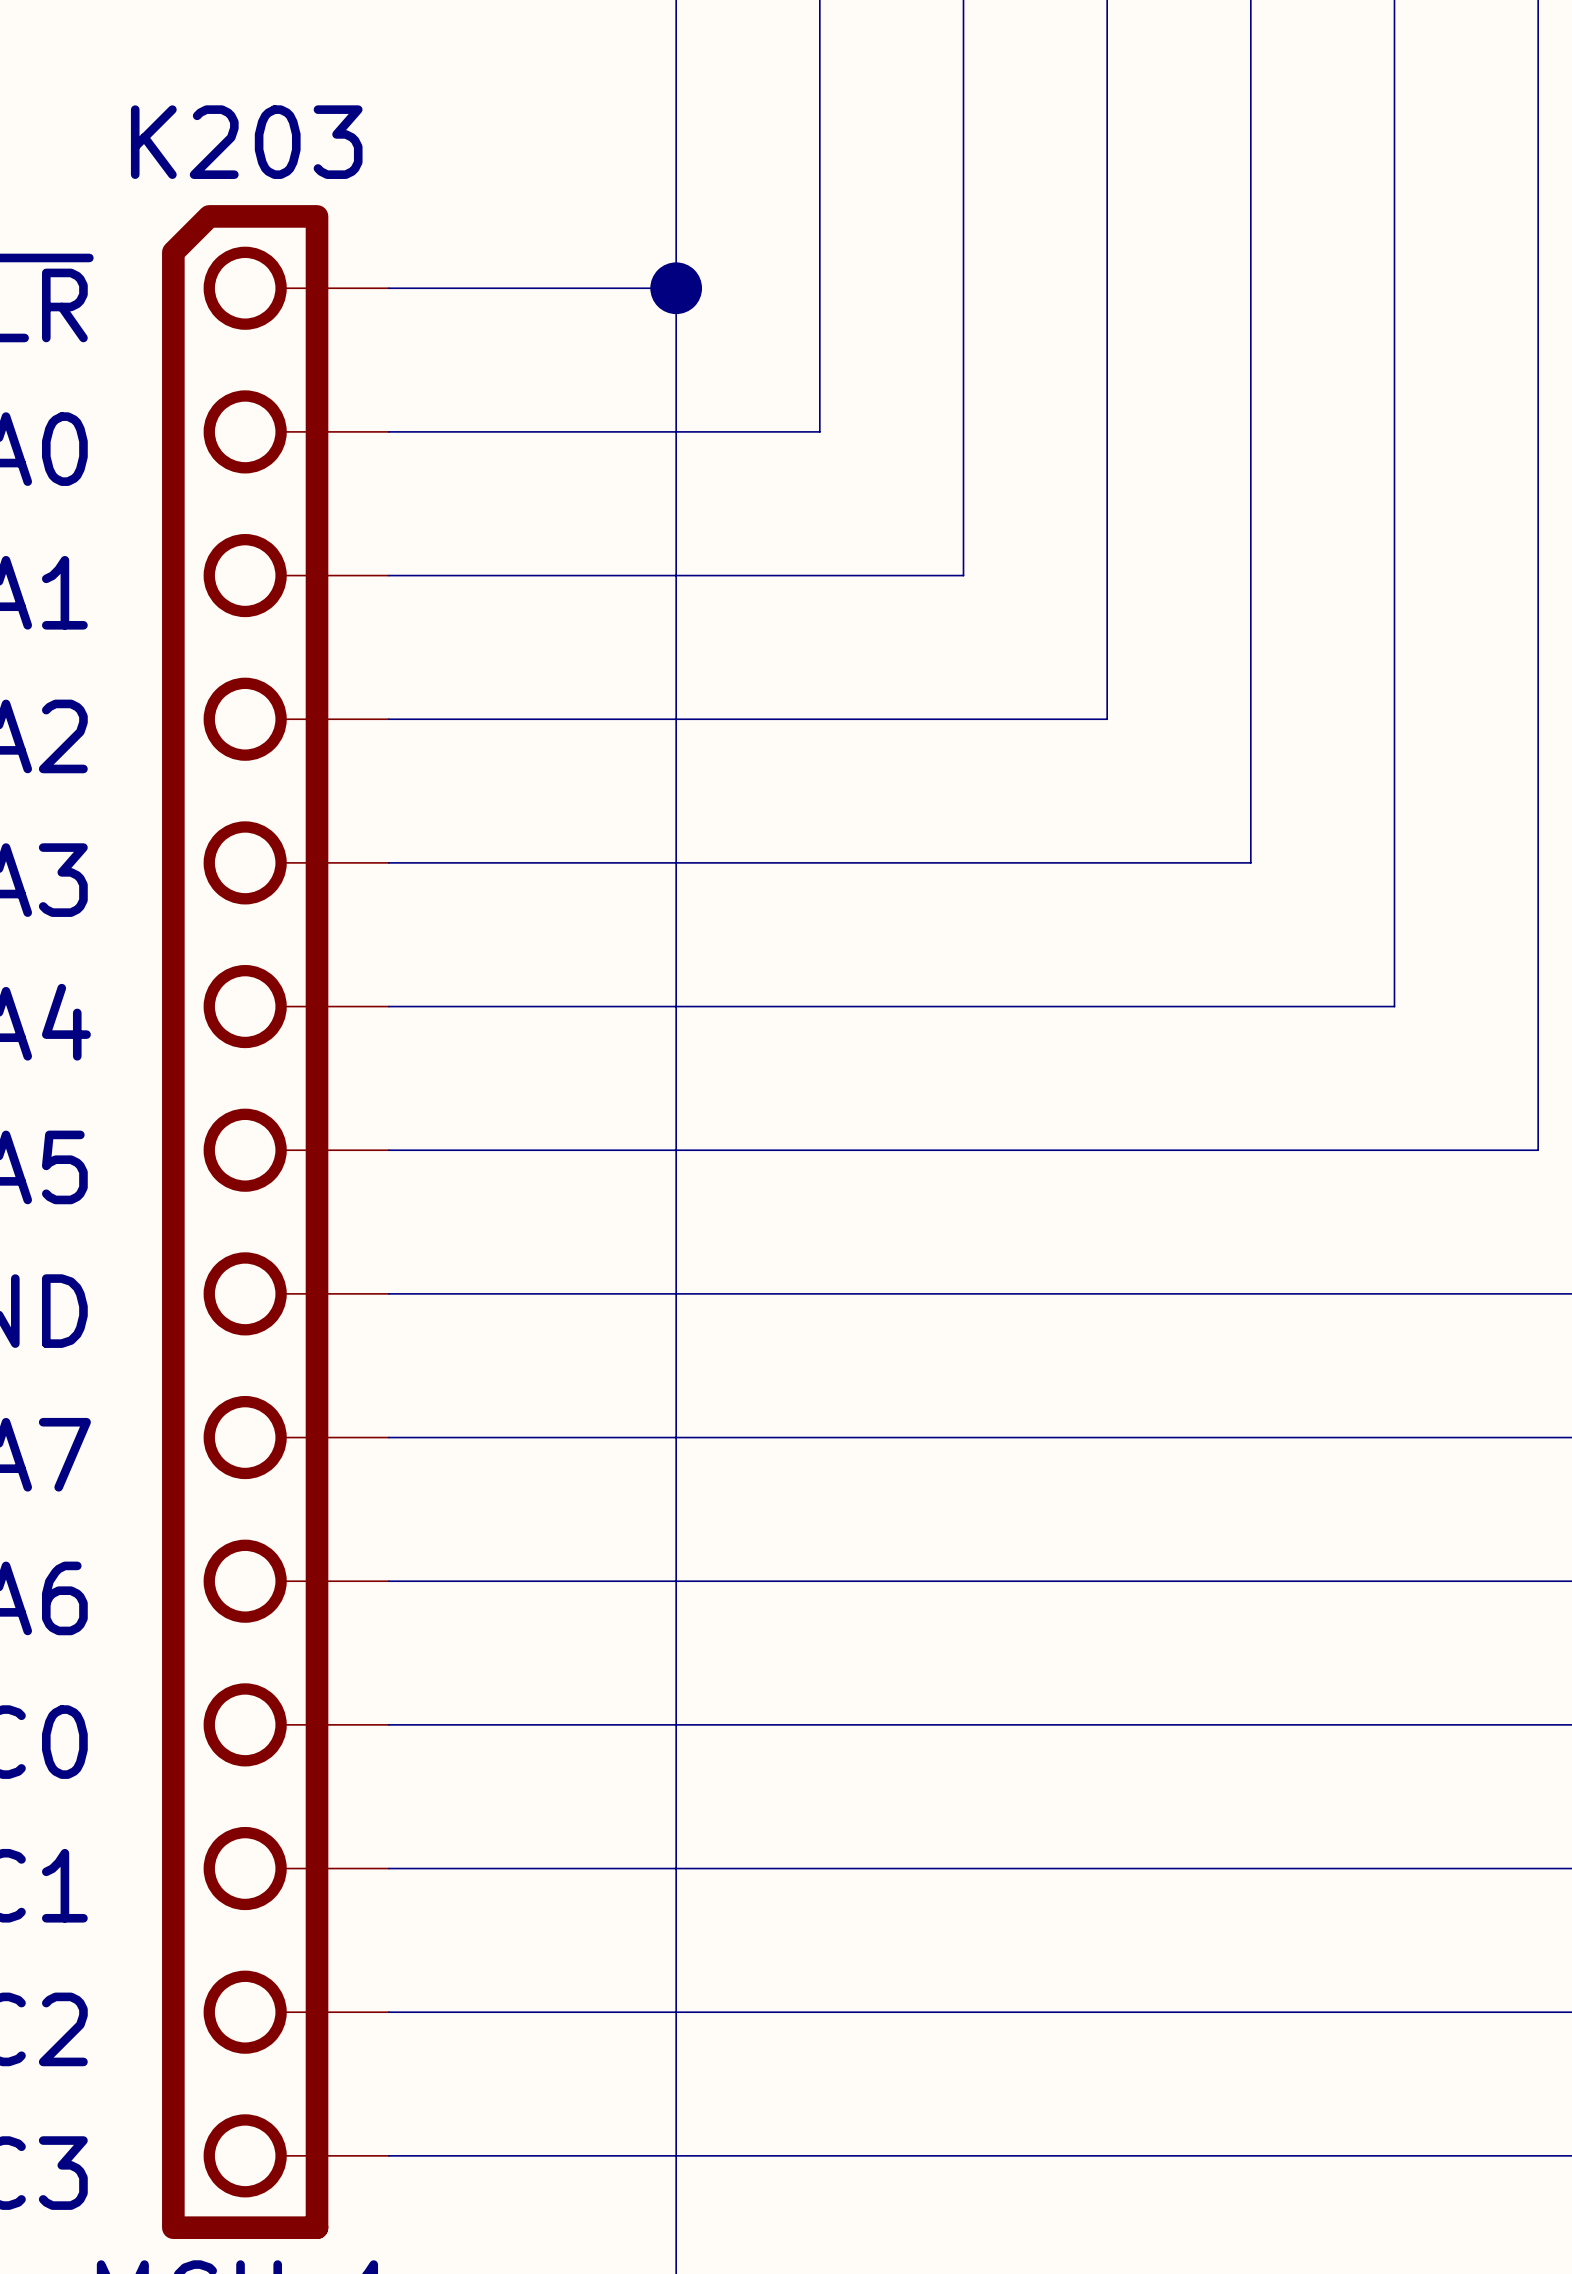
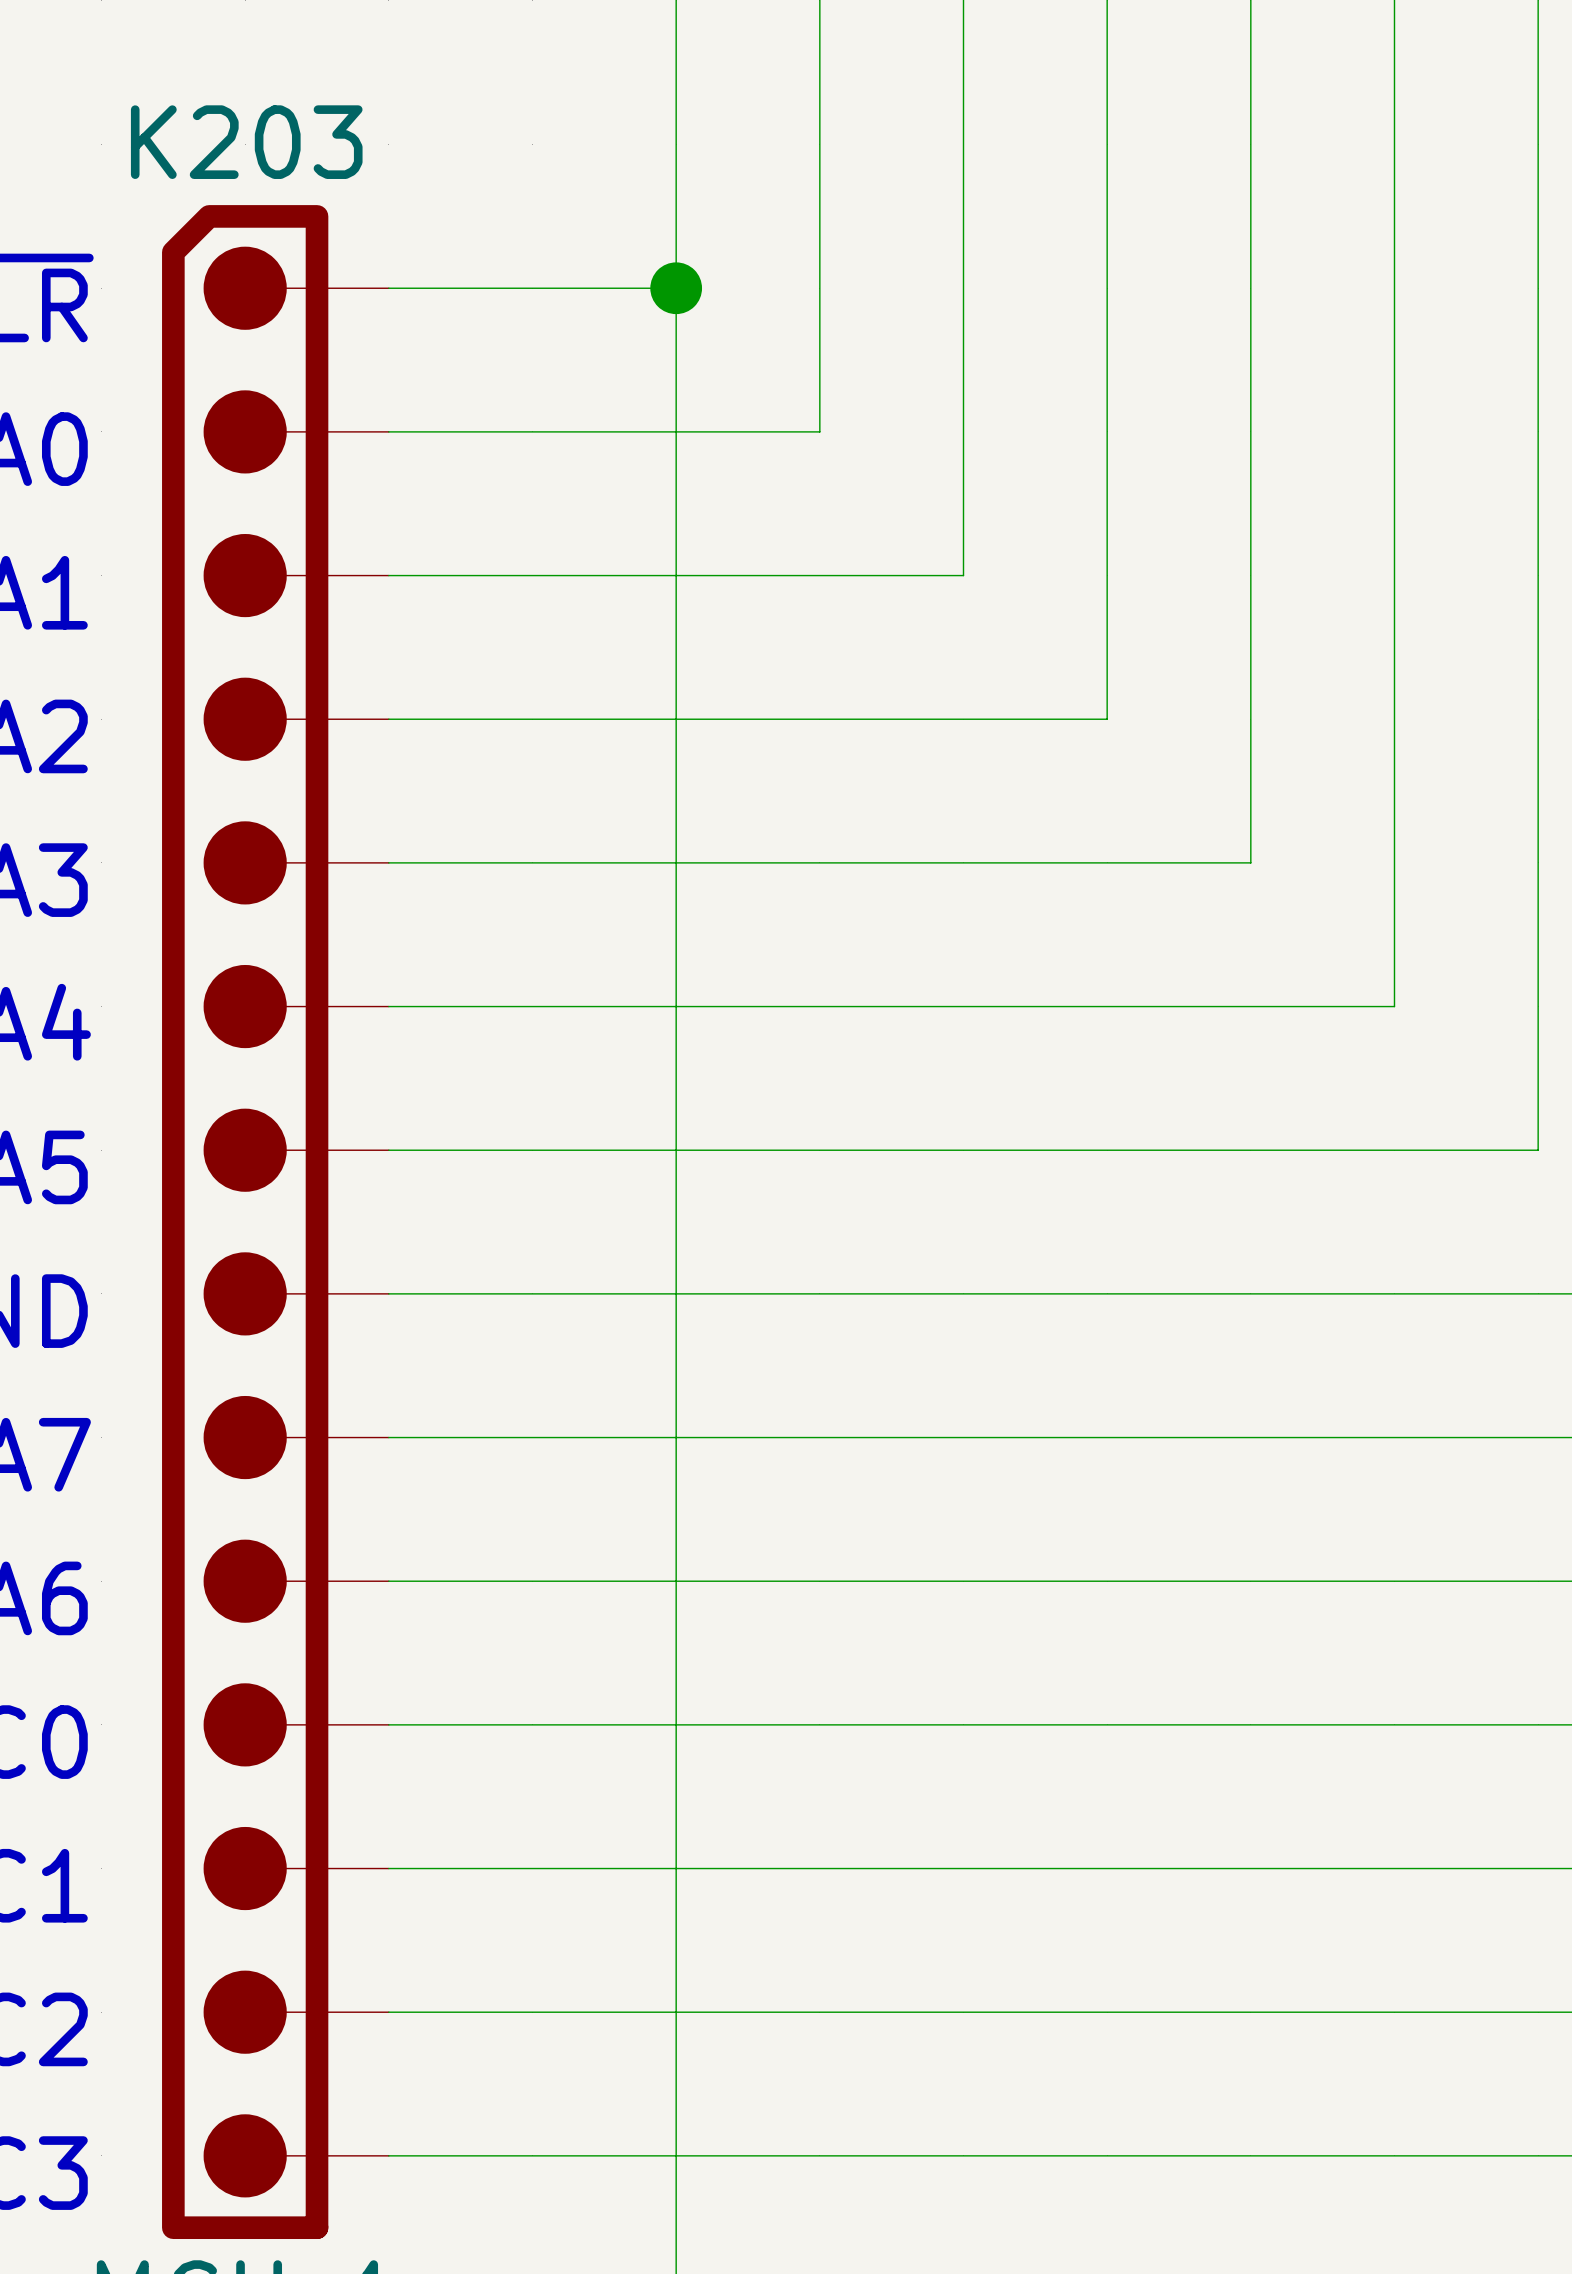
K203 symbol: [162, 205, 389, 2240] -> [162, 205, 389, 2240]

